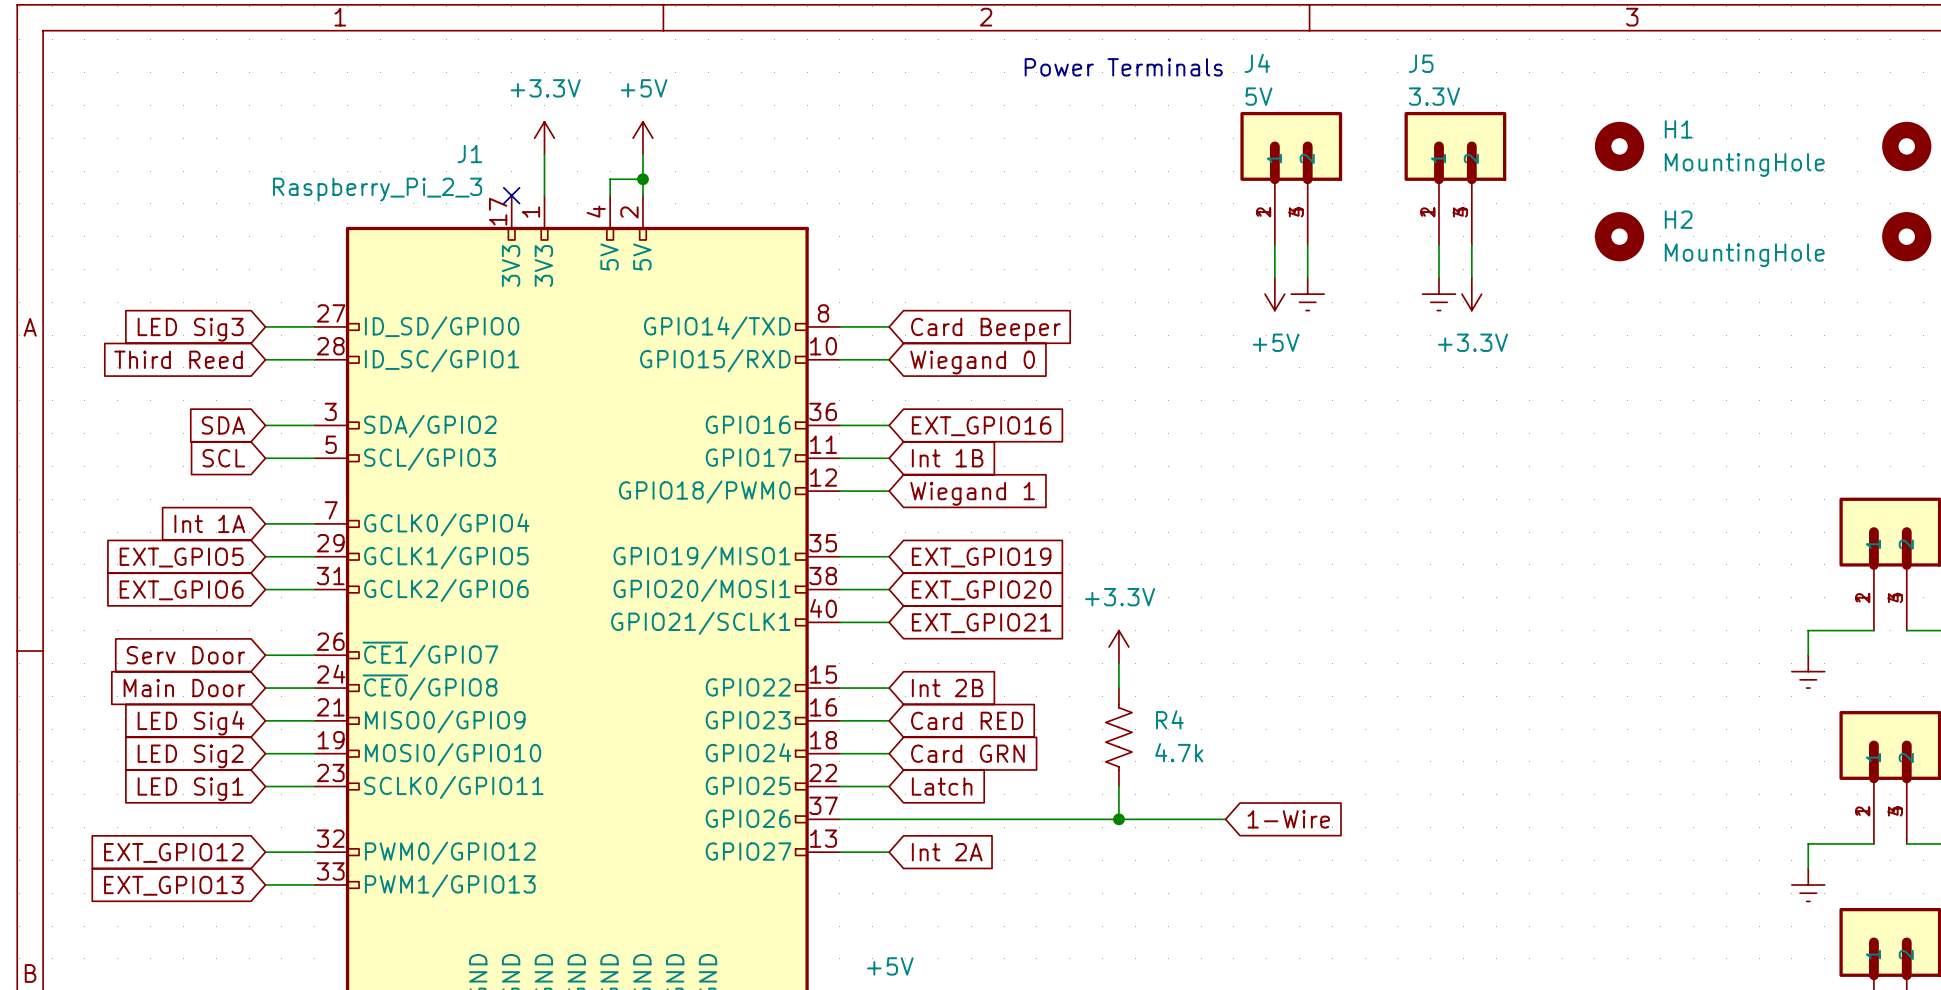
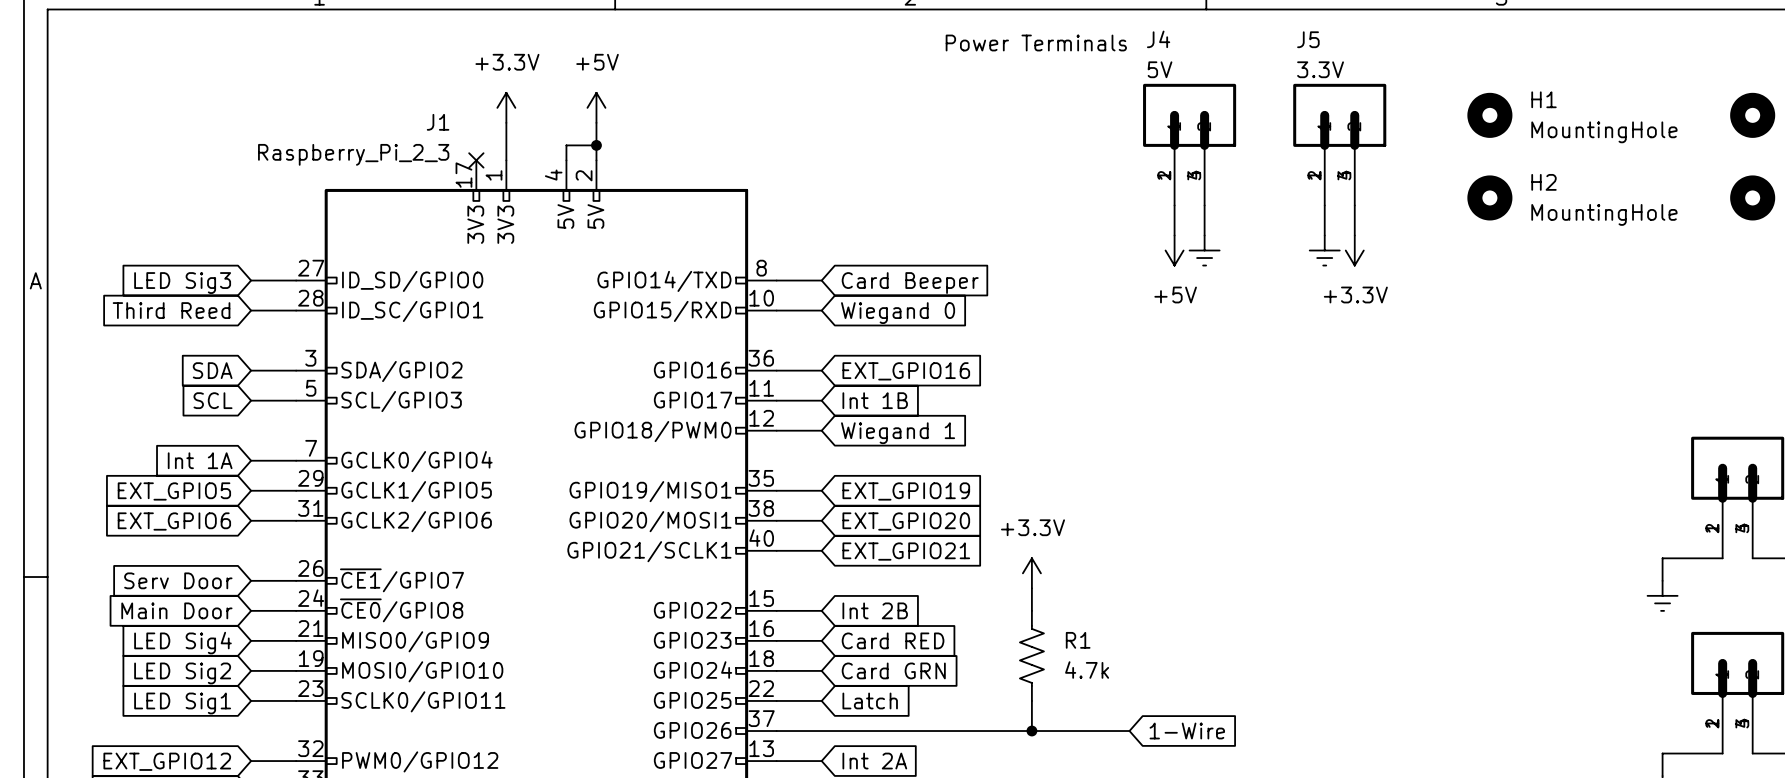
R4 name: R4 (1169, 719) -> R1 (1078, 640)

